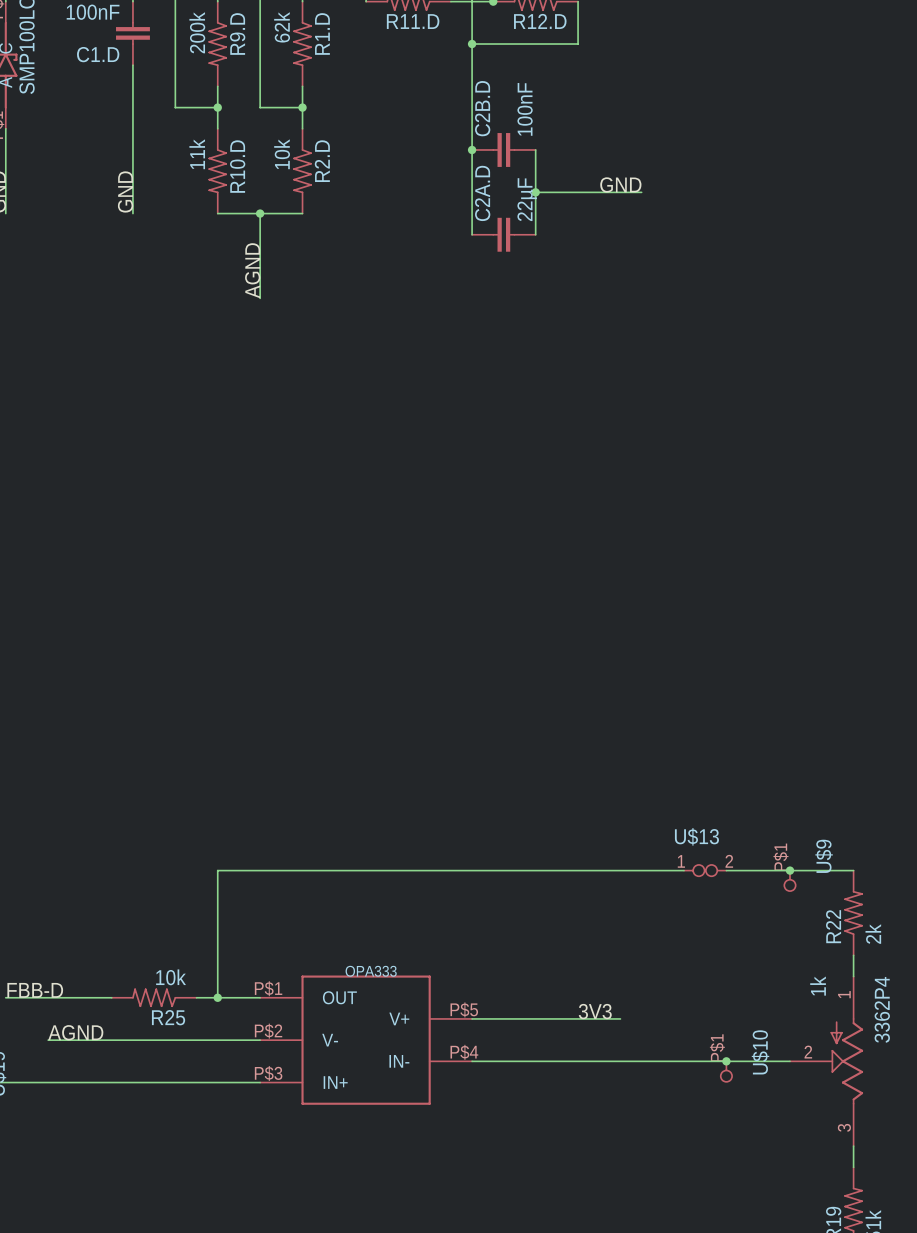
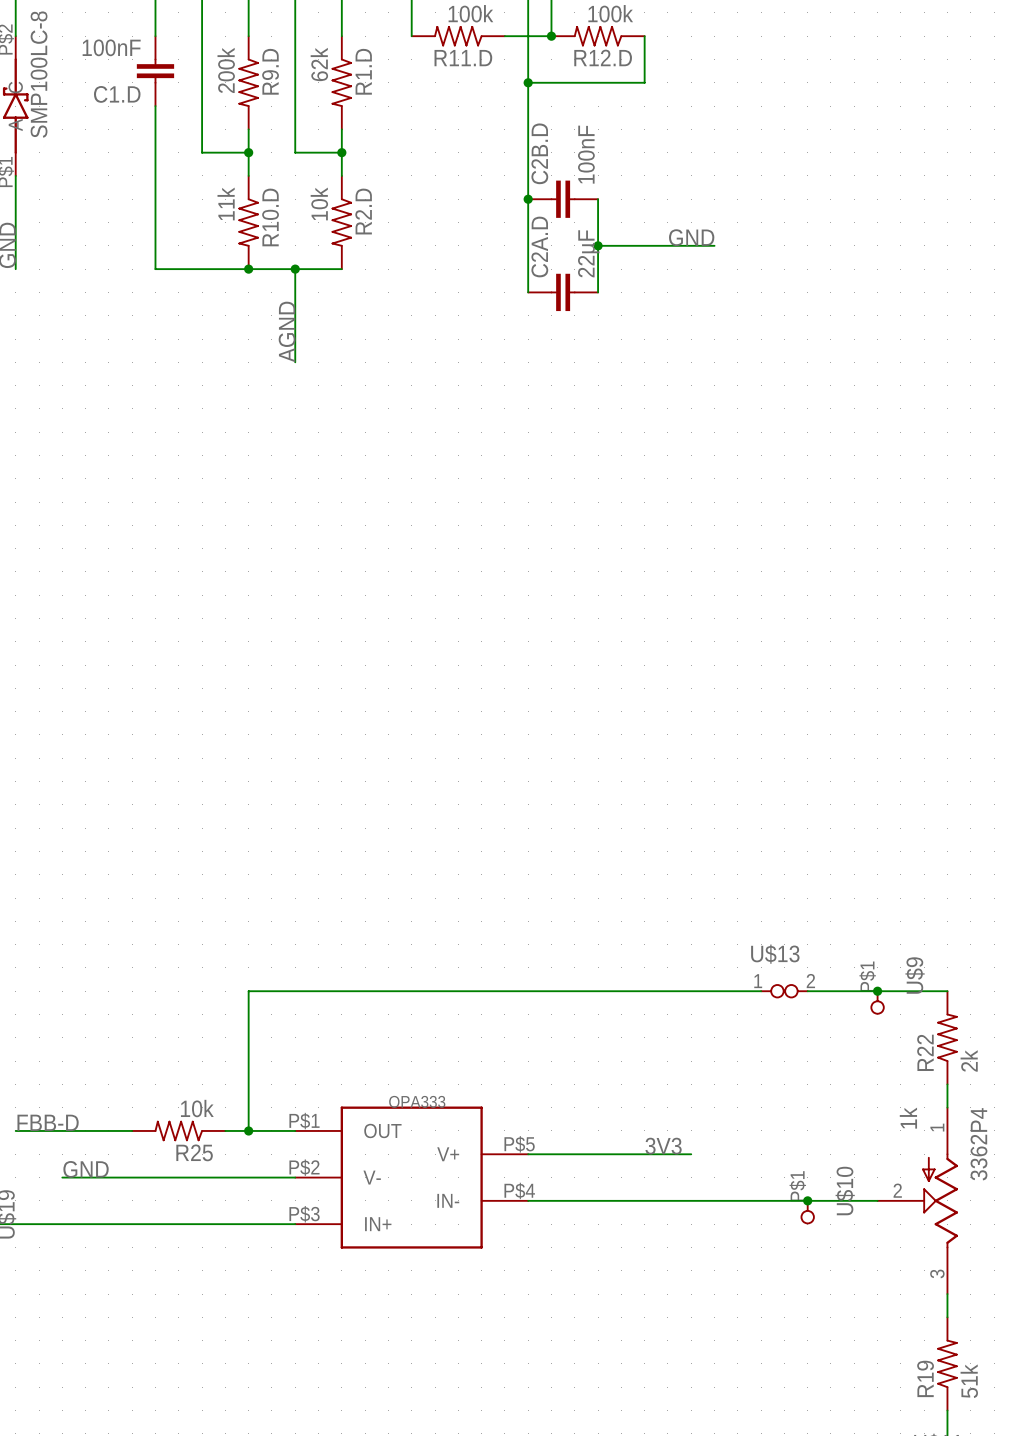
label: GND (125, 191) -> none
wire: none -> (155, 269) (248, 269)
junction: none -> (248, 269)
label: AGND (75, 1032) -> GND (86, 1169)

